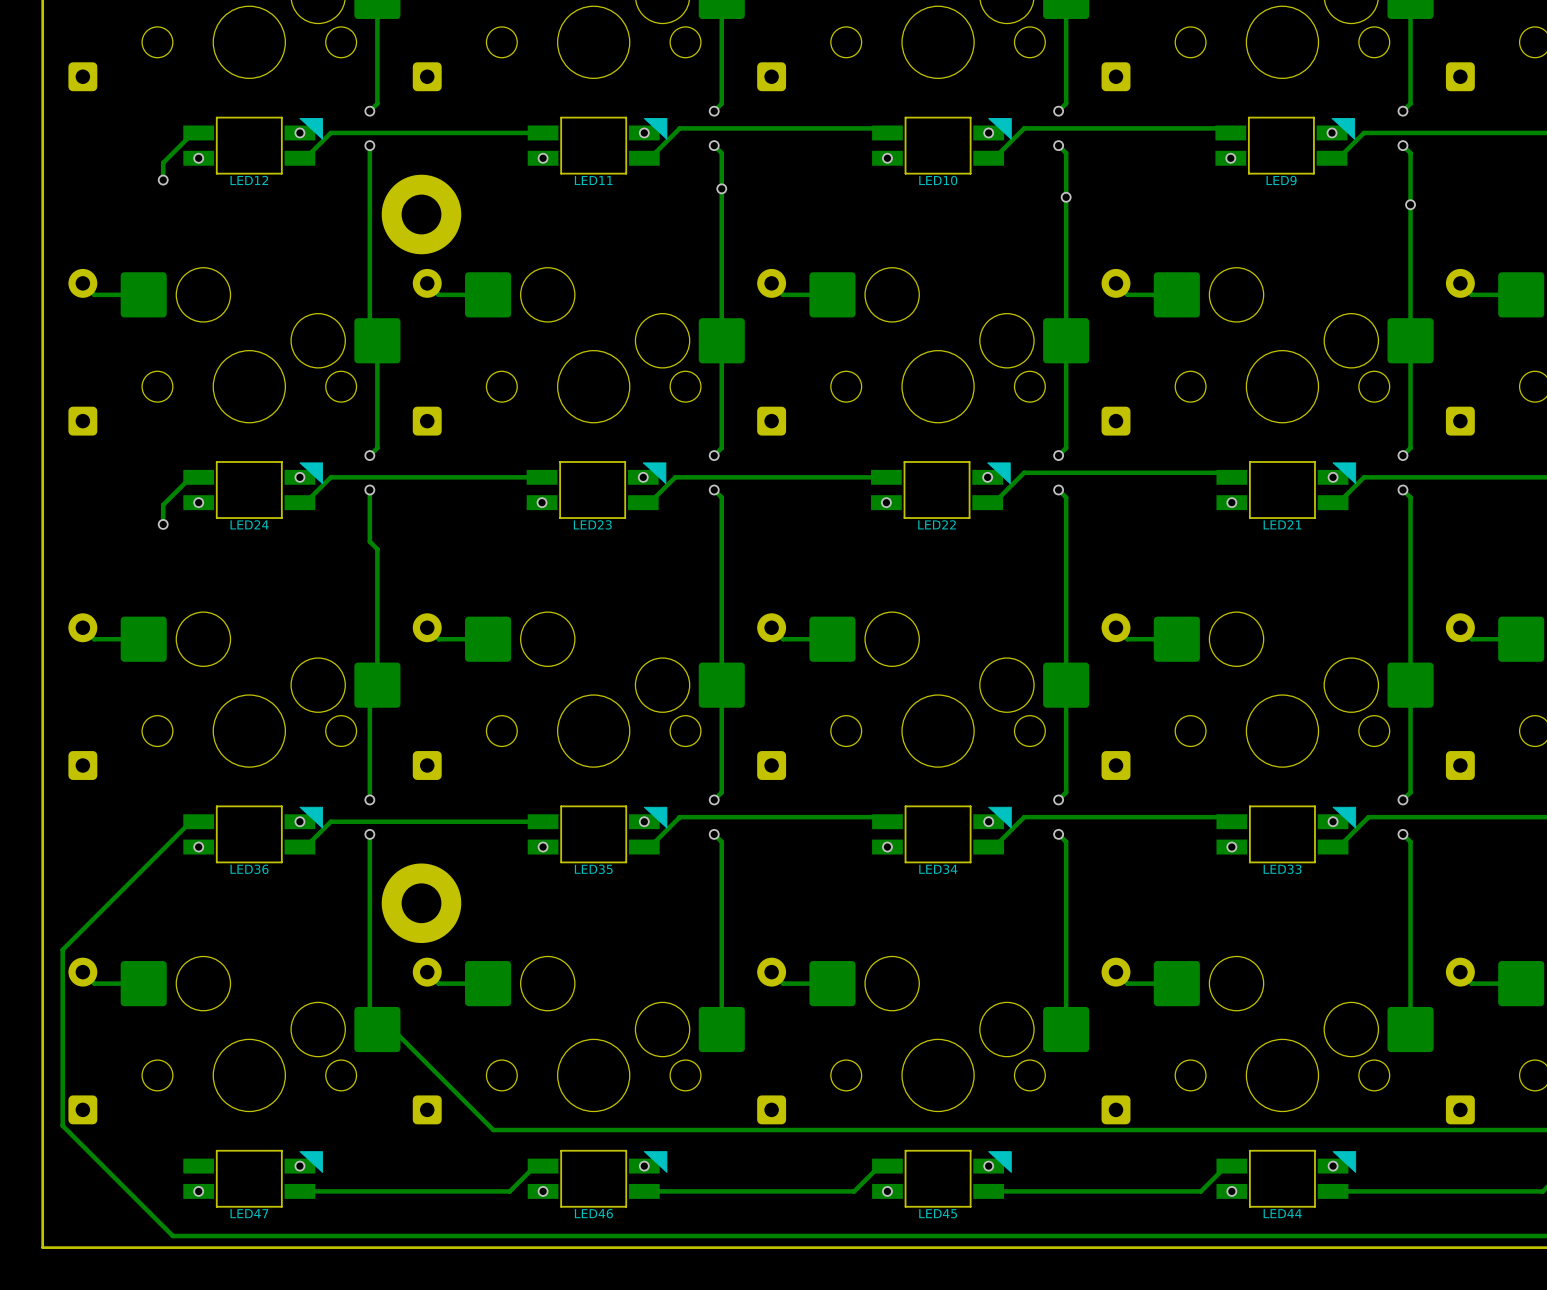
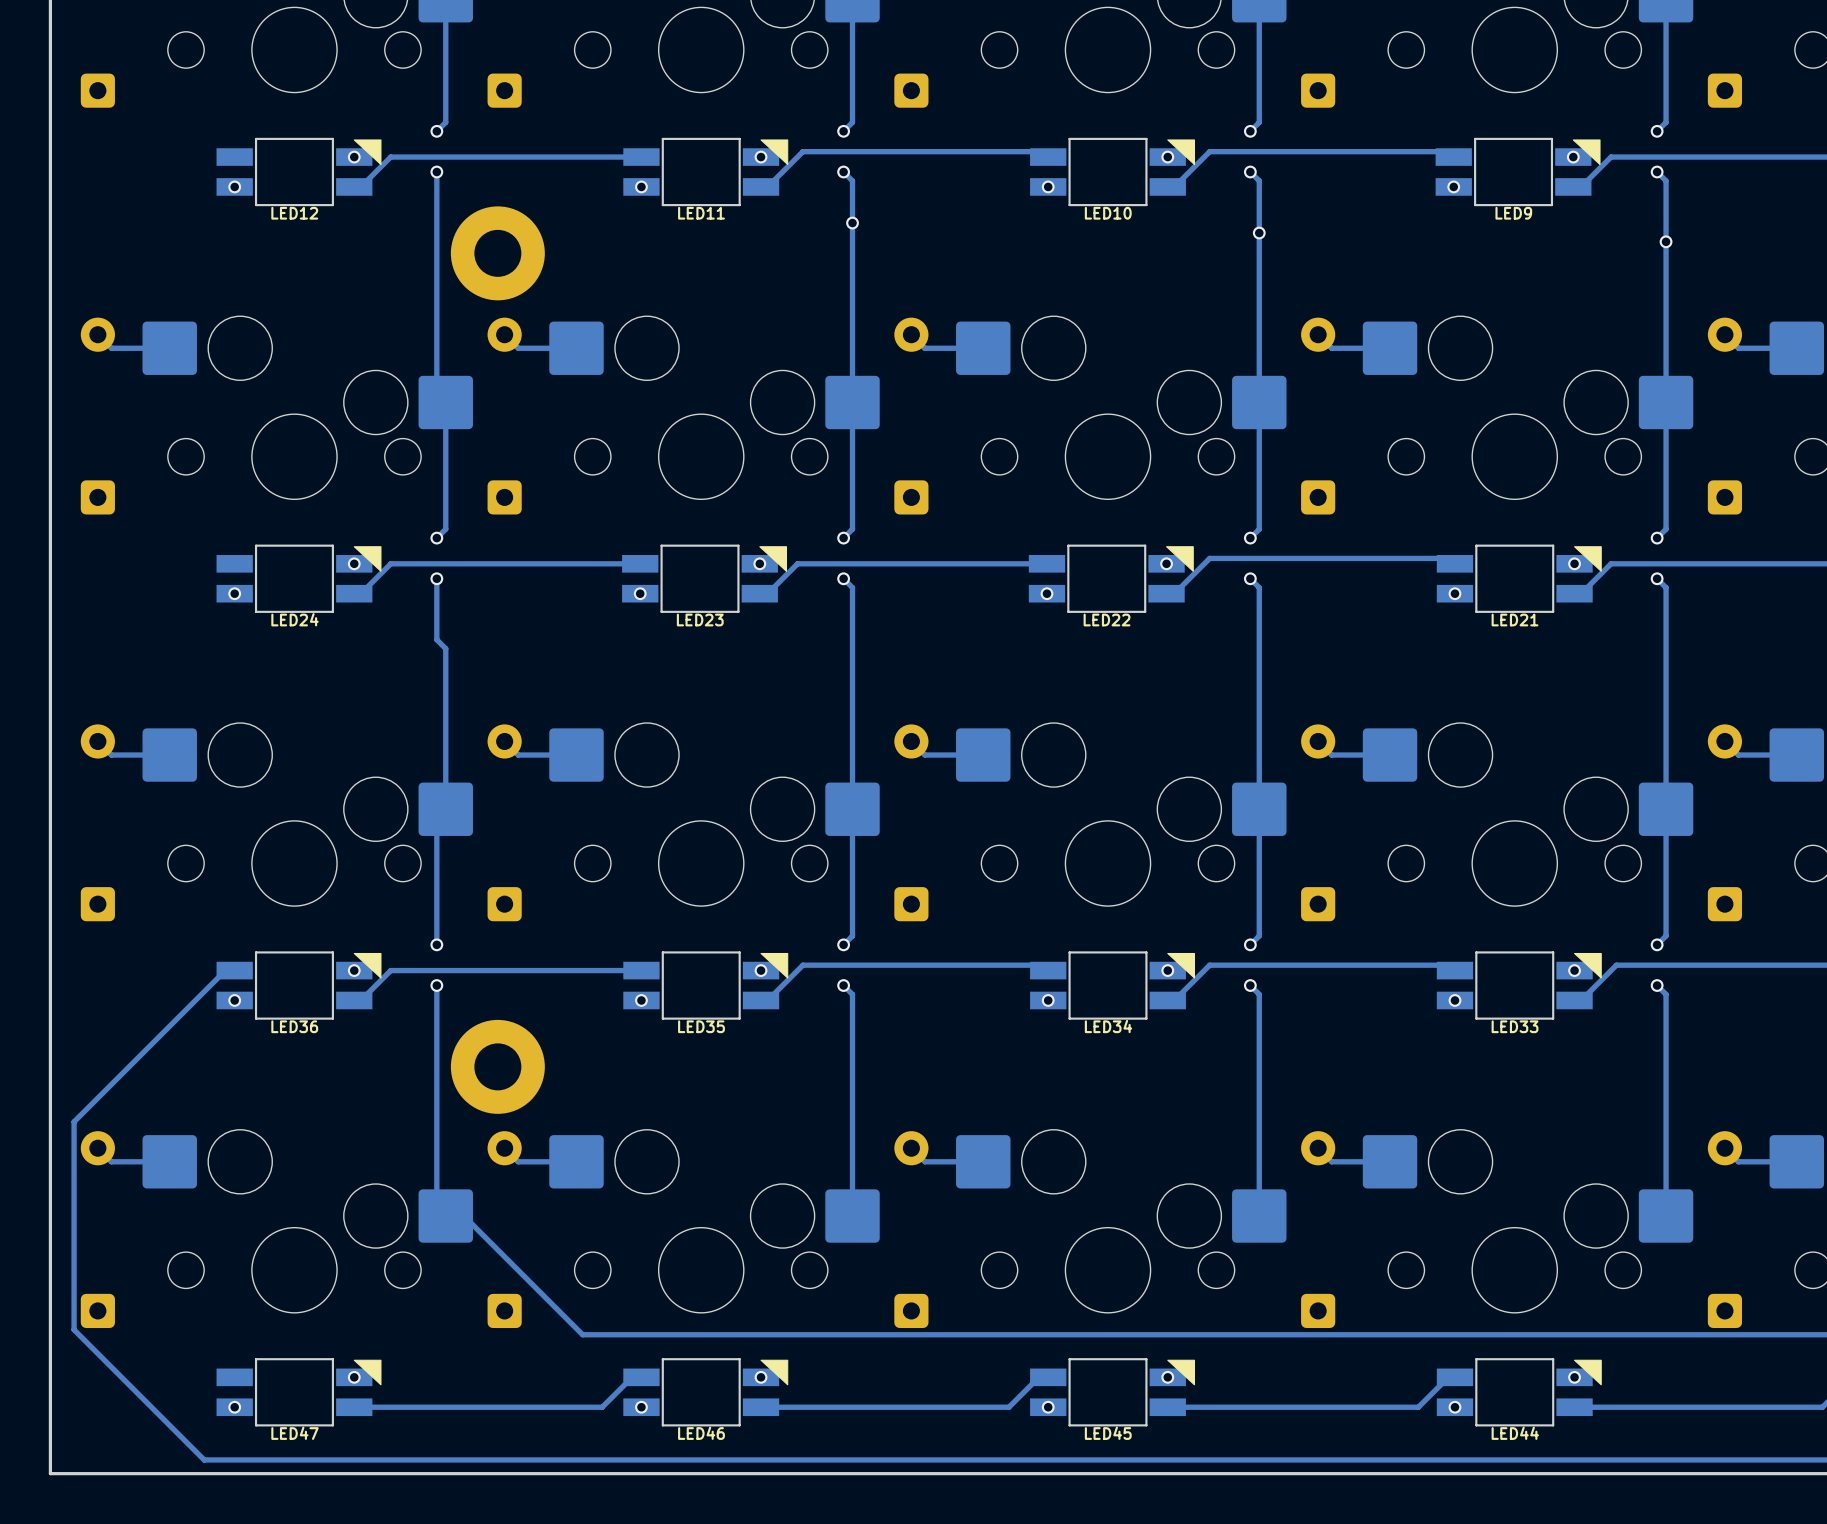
track: (193, 132) (163, 162) (163, 180) -> none
via: (163, 180) -> none
track: (190, 477) (163, 504) (163, 524) -> none
via: (163, 524) -> none

